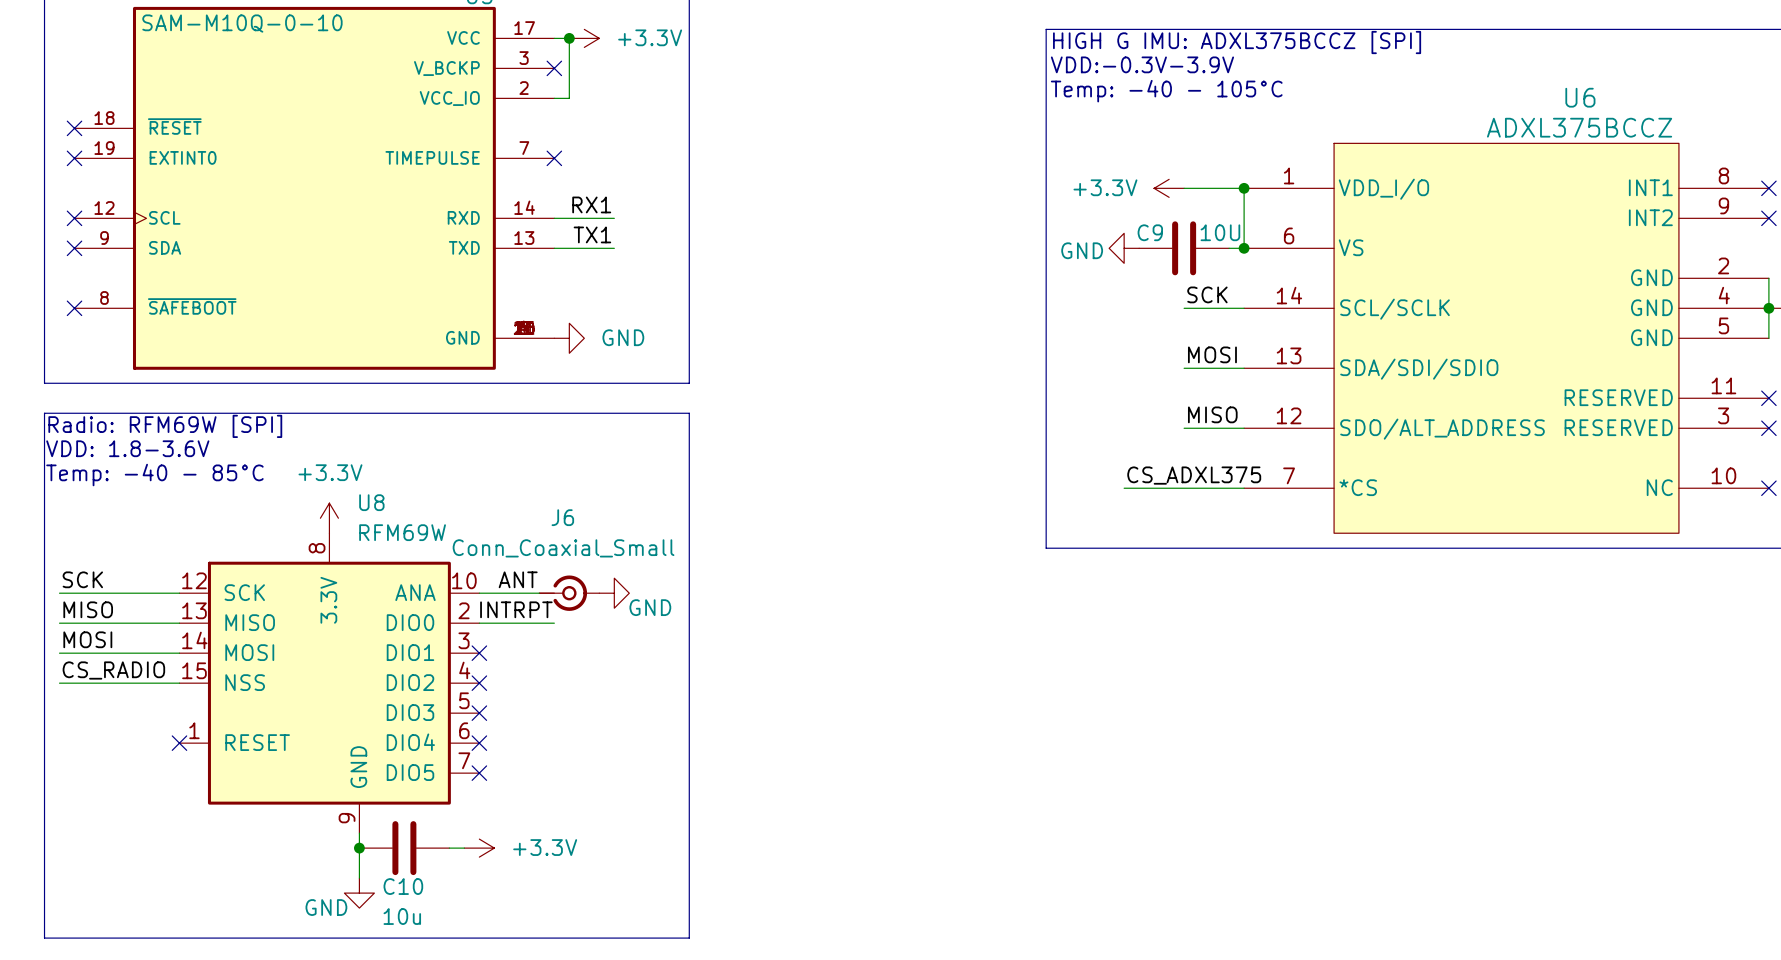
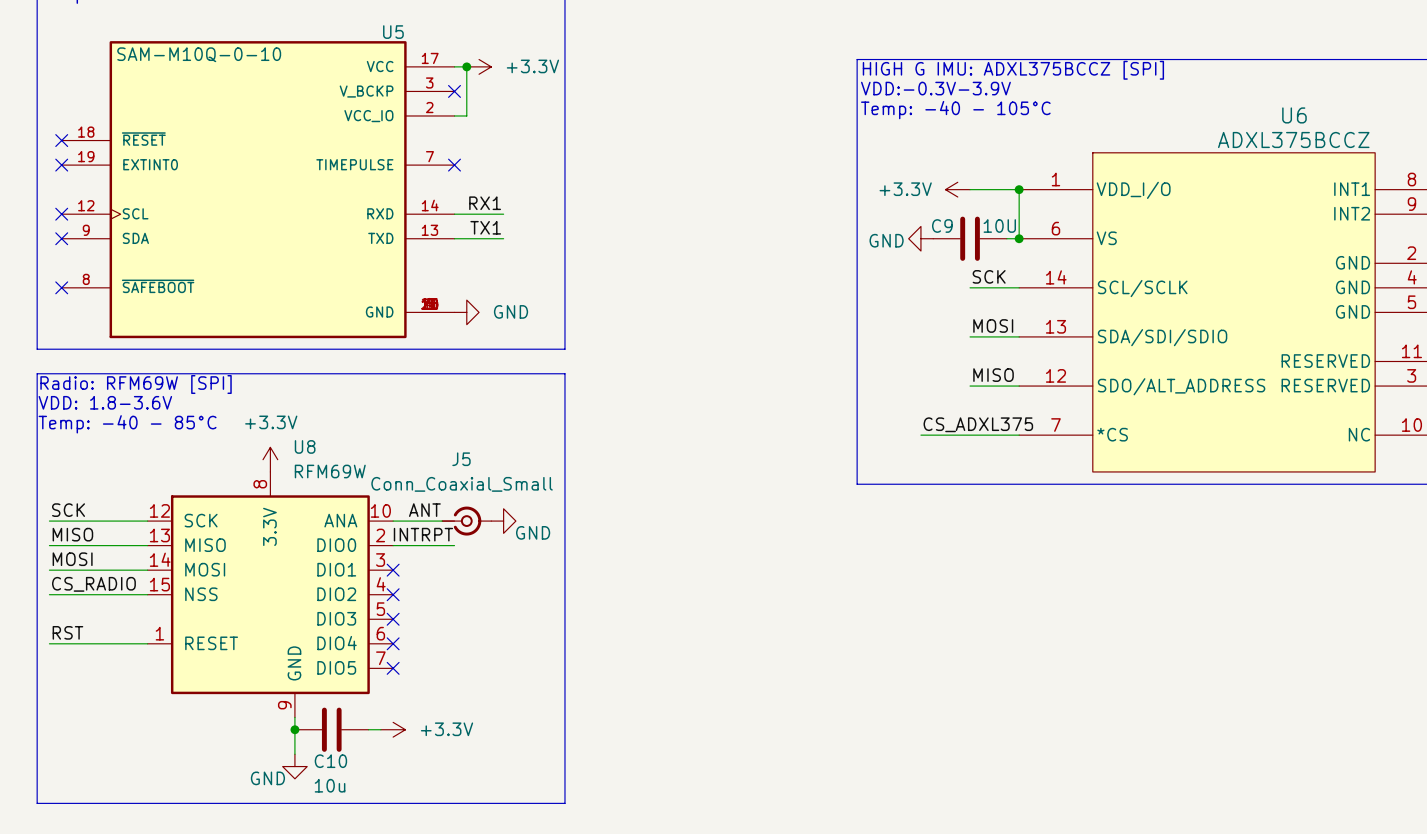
J6 name: J6 (562, 517) -> J5 (461, 459)
label: none -> RST (67, 632)
wire: none -> (49, 643) (147, 643)
no-connect mark: (179, 743) -> none

